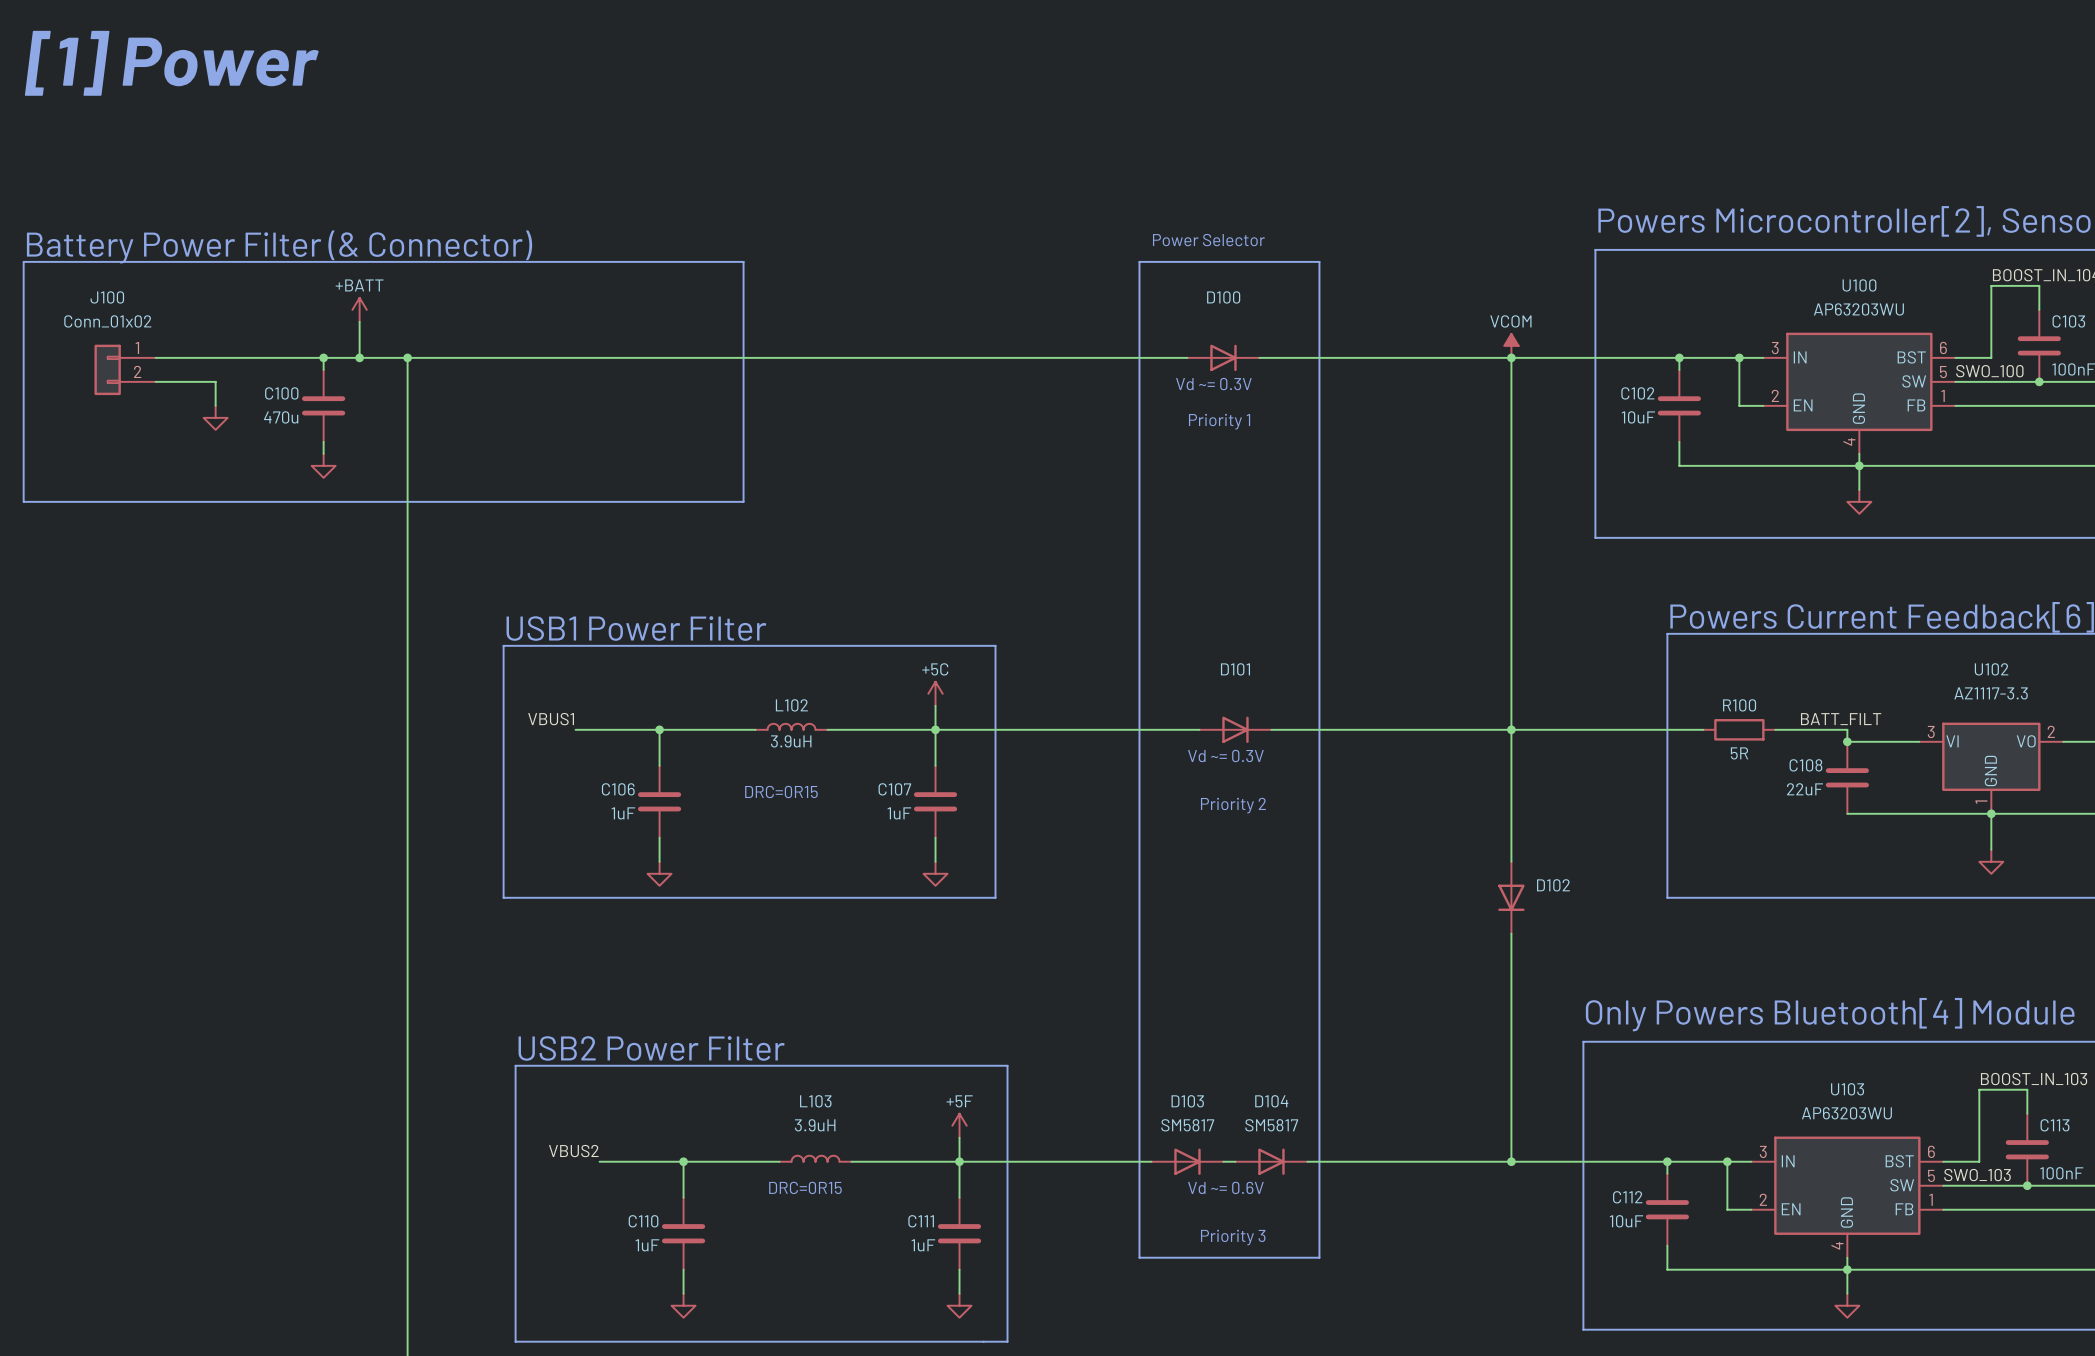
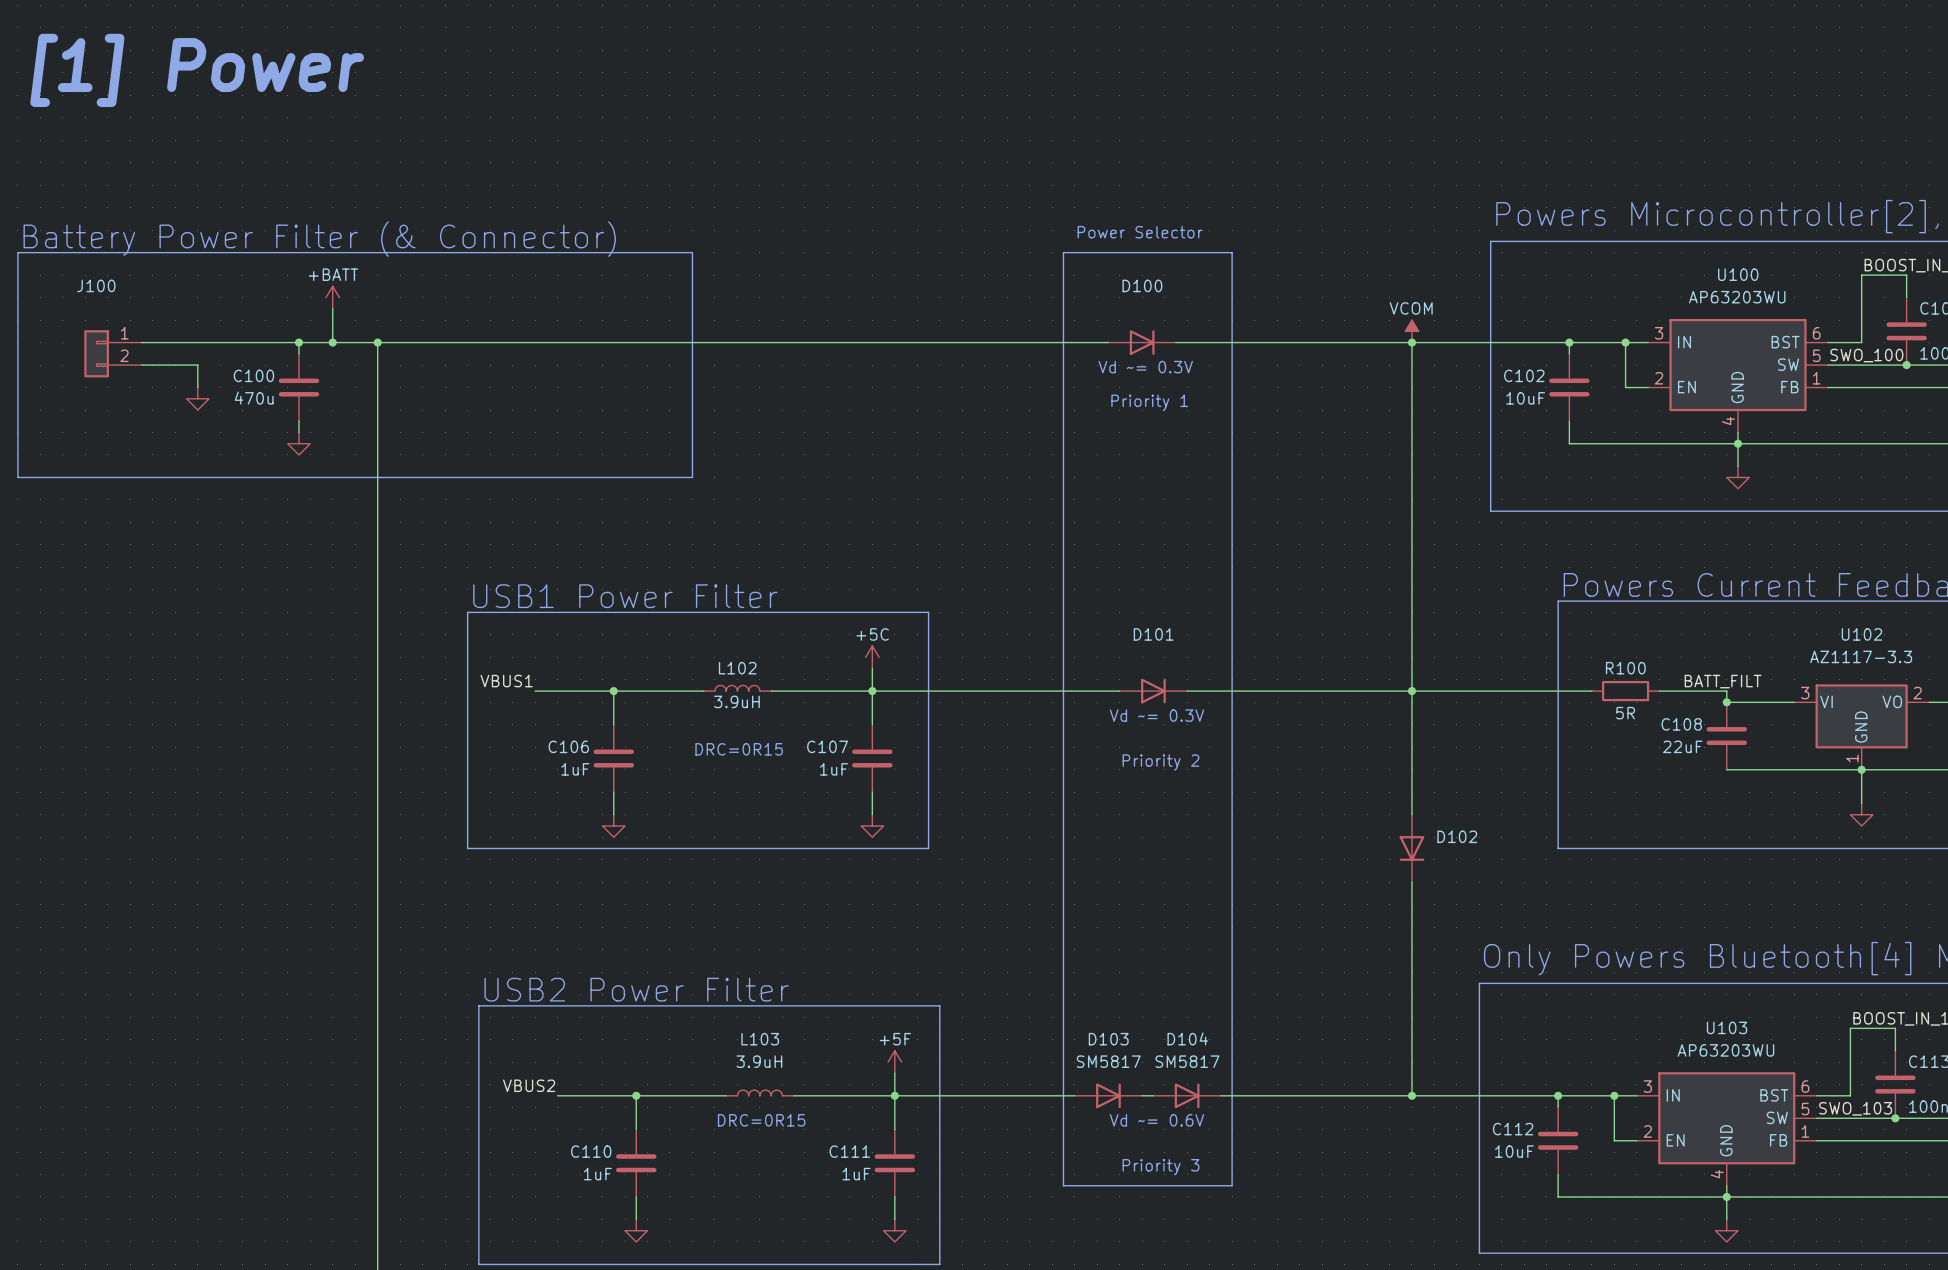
J100 value: Conn_01x02 (107, 321) -> none

